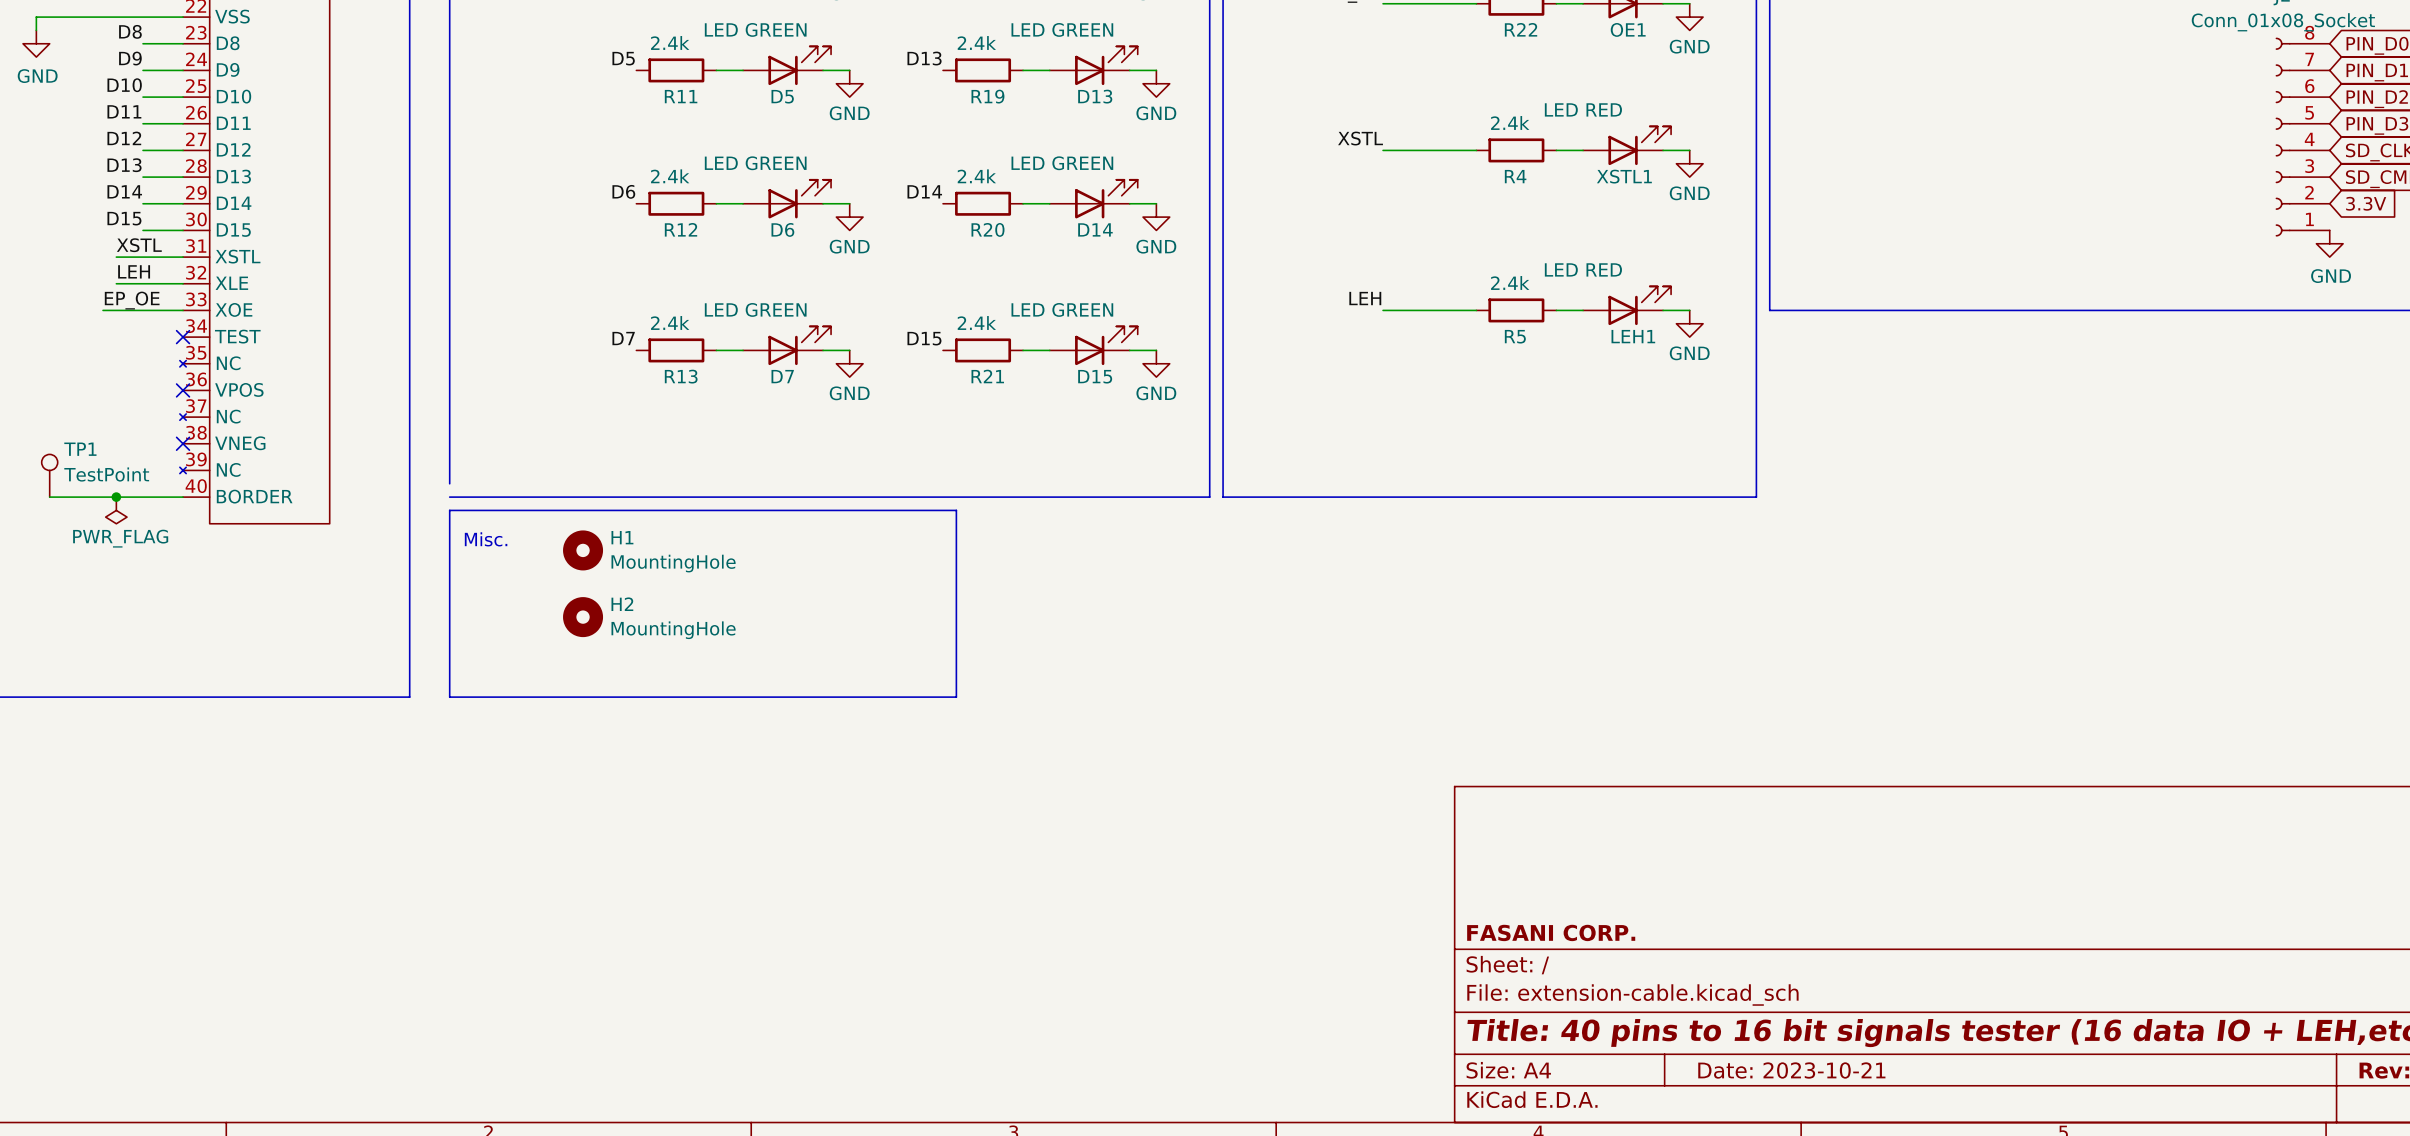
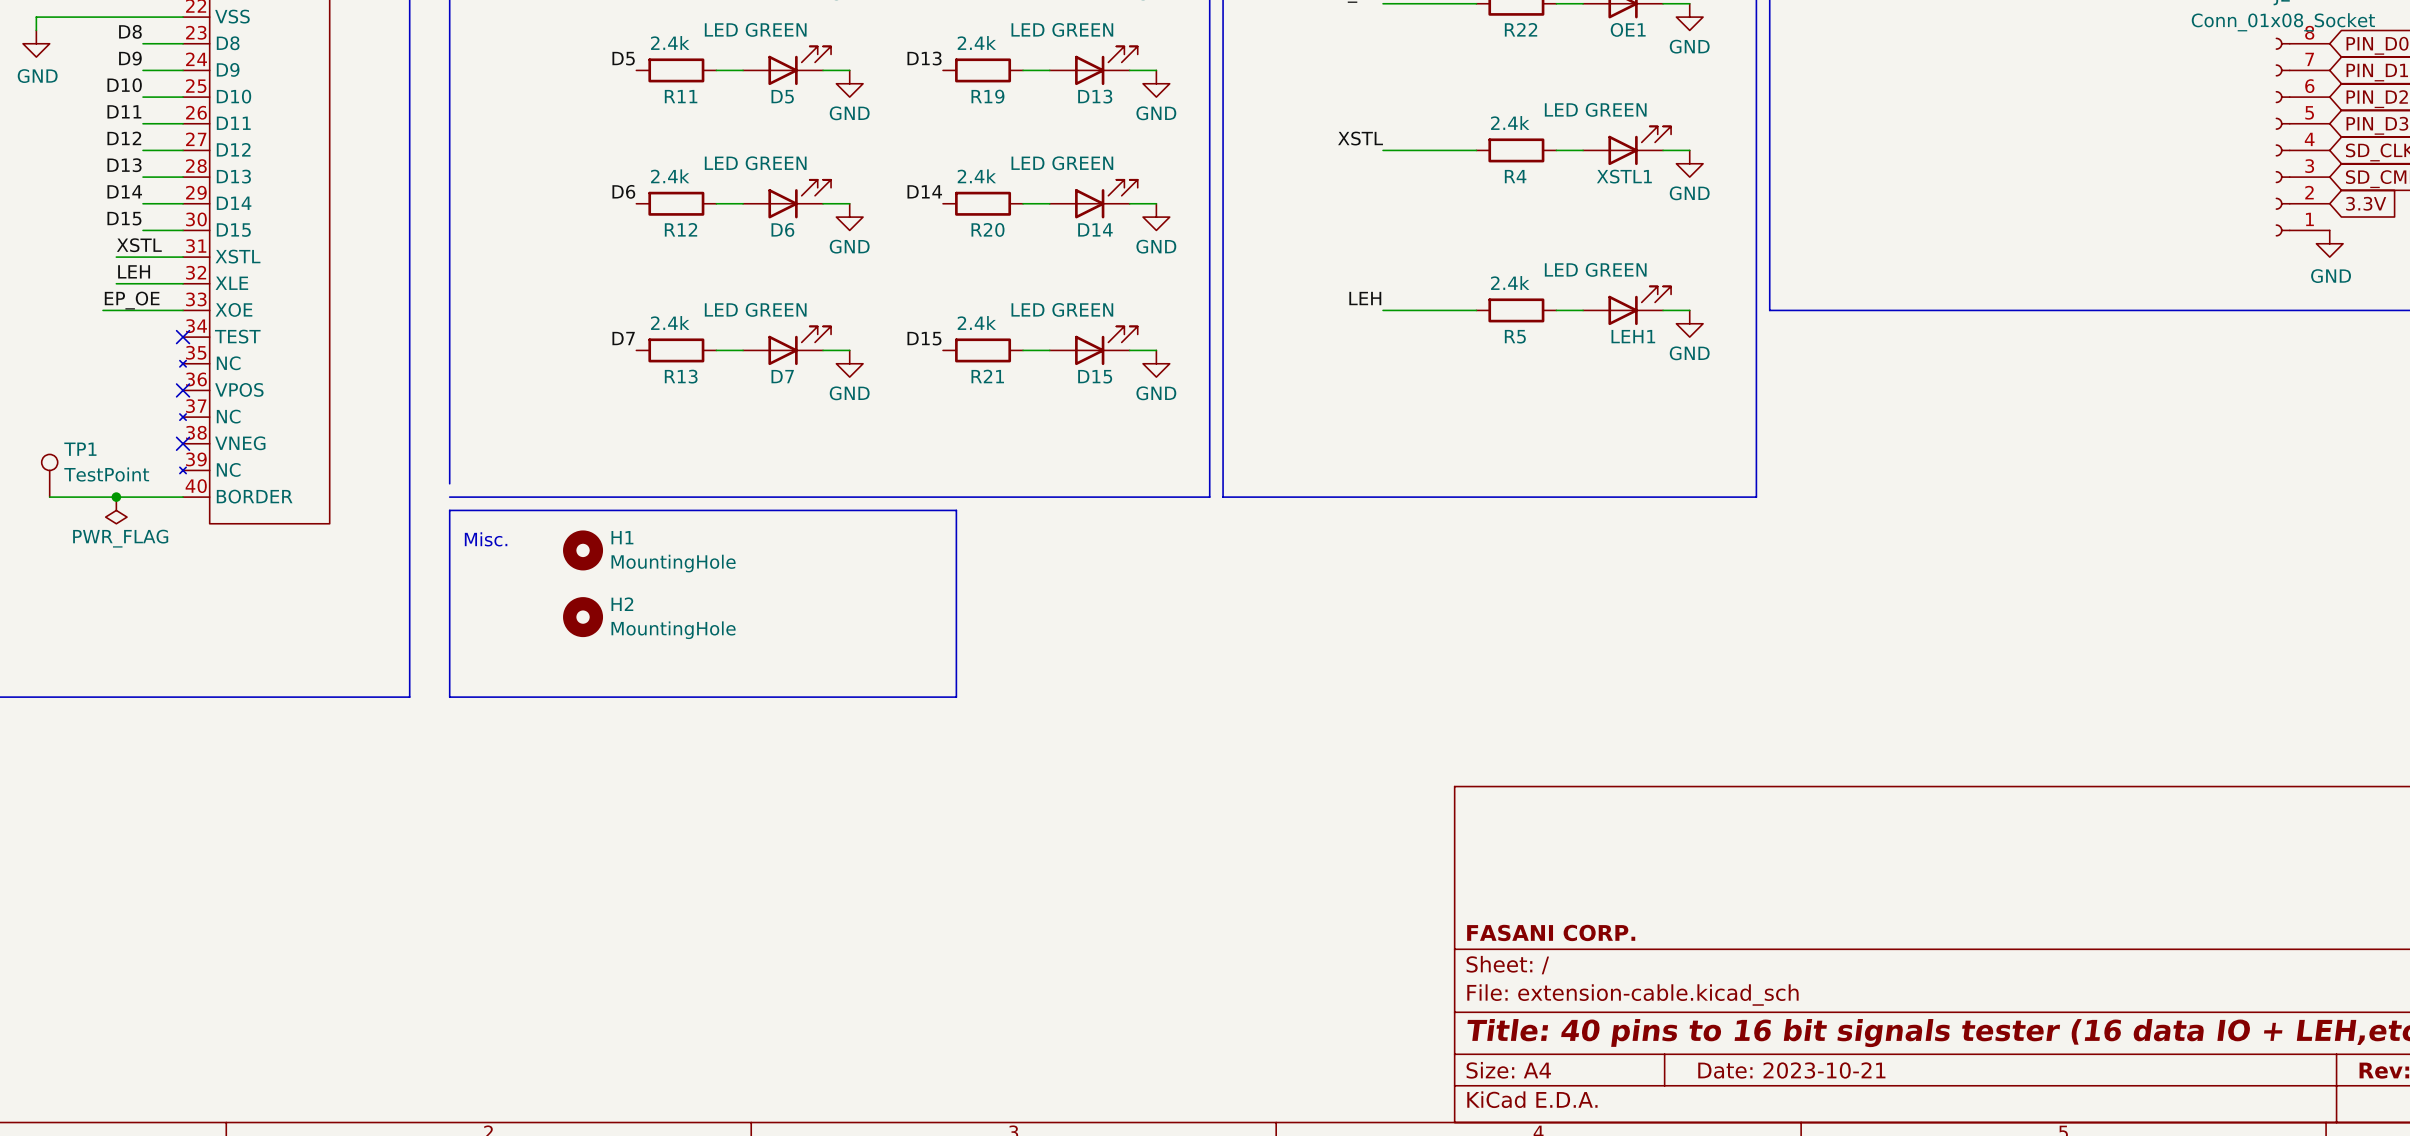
XSTL1 value: LED RED (1583, 109) -> LED GREEN (1595, 109)
LEH1 value: LED RED (1583, 269) -> LED GREEN (1595, 269)

